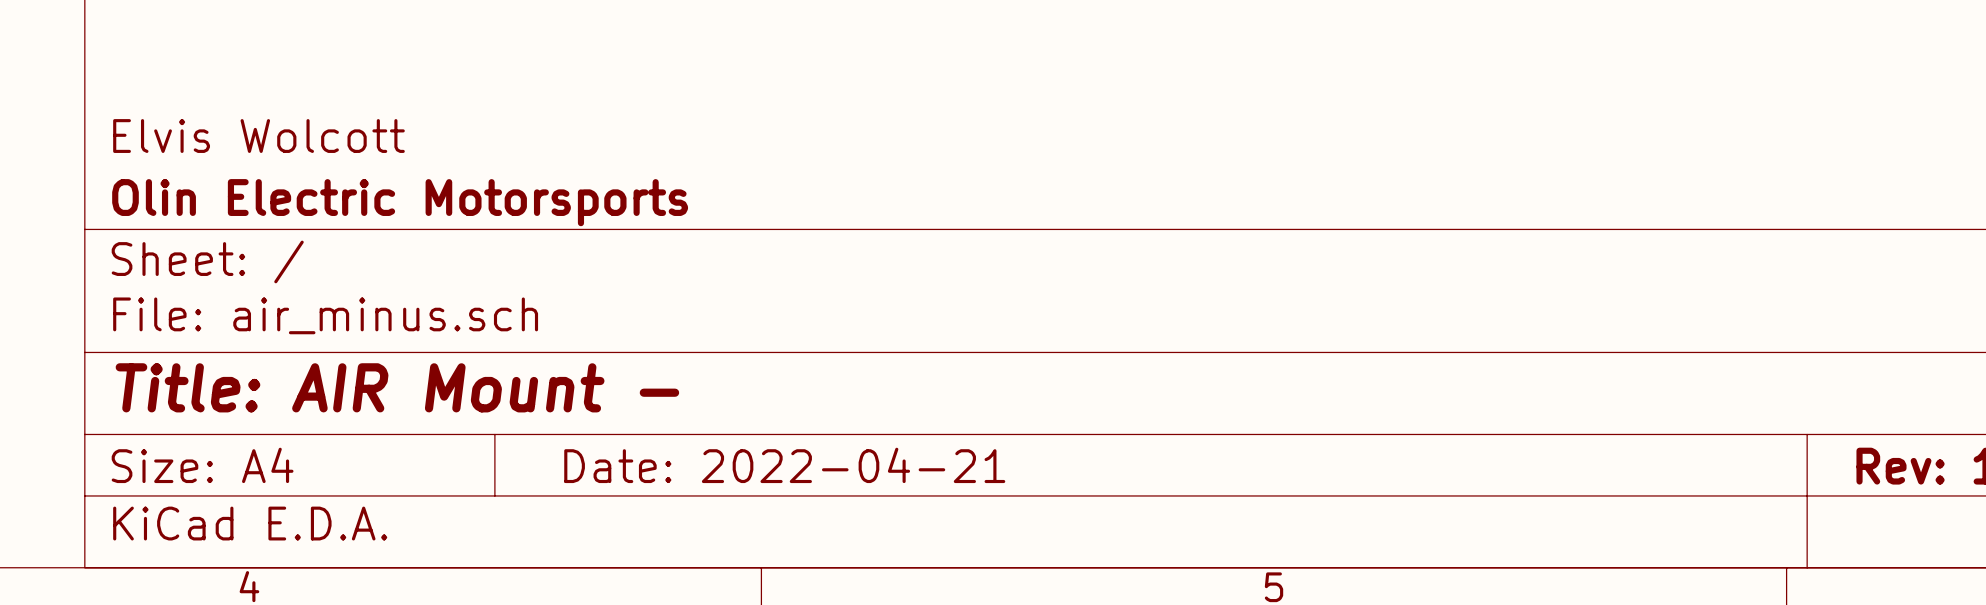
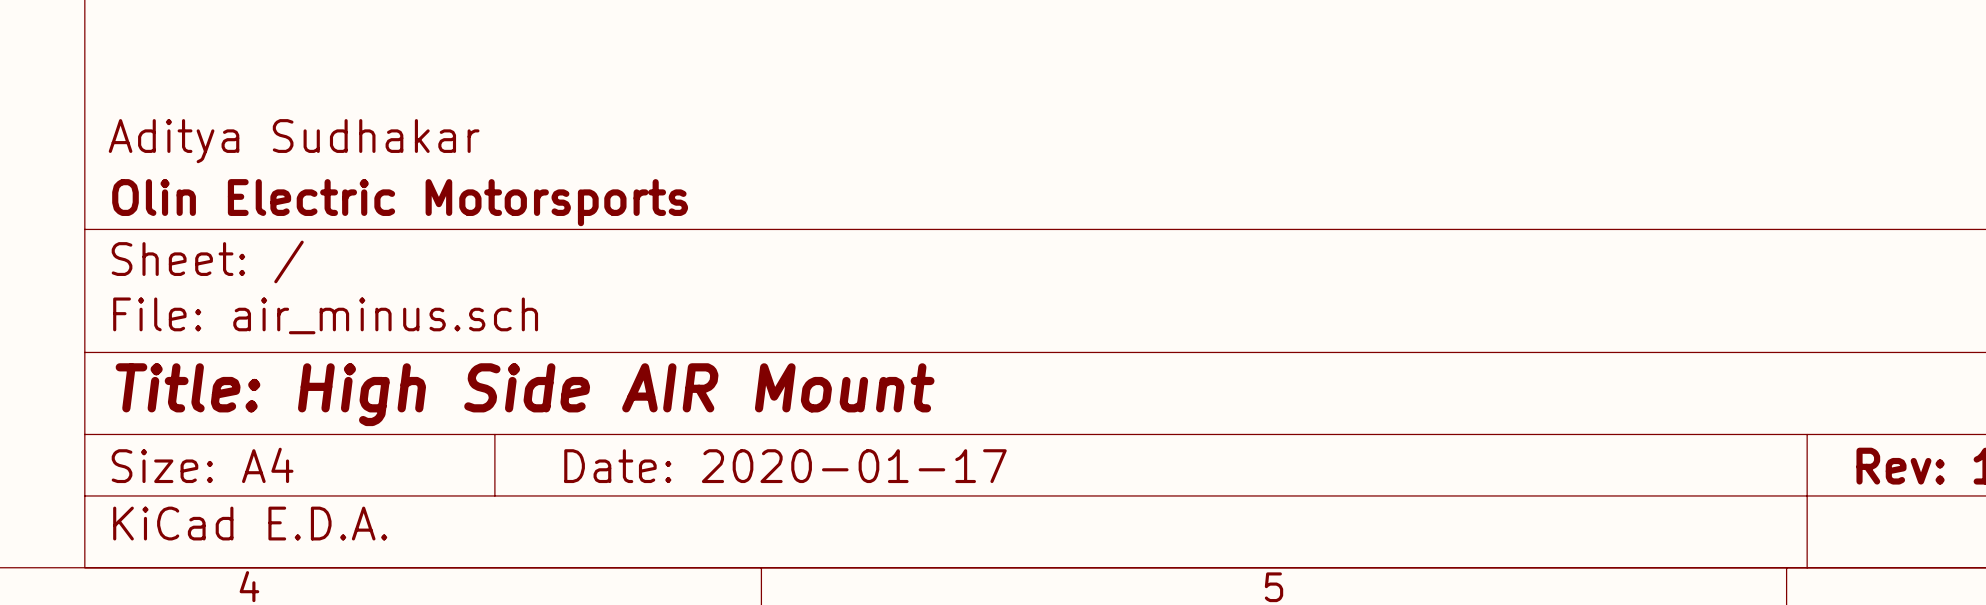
title block: Elvis Wolcott (258, 136) -> Aditya Sudhakar (294, 141)
title block: Title: AIR Mount - (397, 387) -> Title: High Side AIR Mount (525, 394)
title block: Date: 2022-04-21 (784, 465) -> Date: 2020-01-17 (785, 466)

